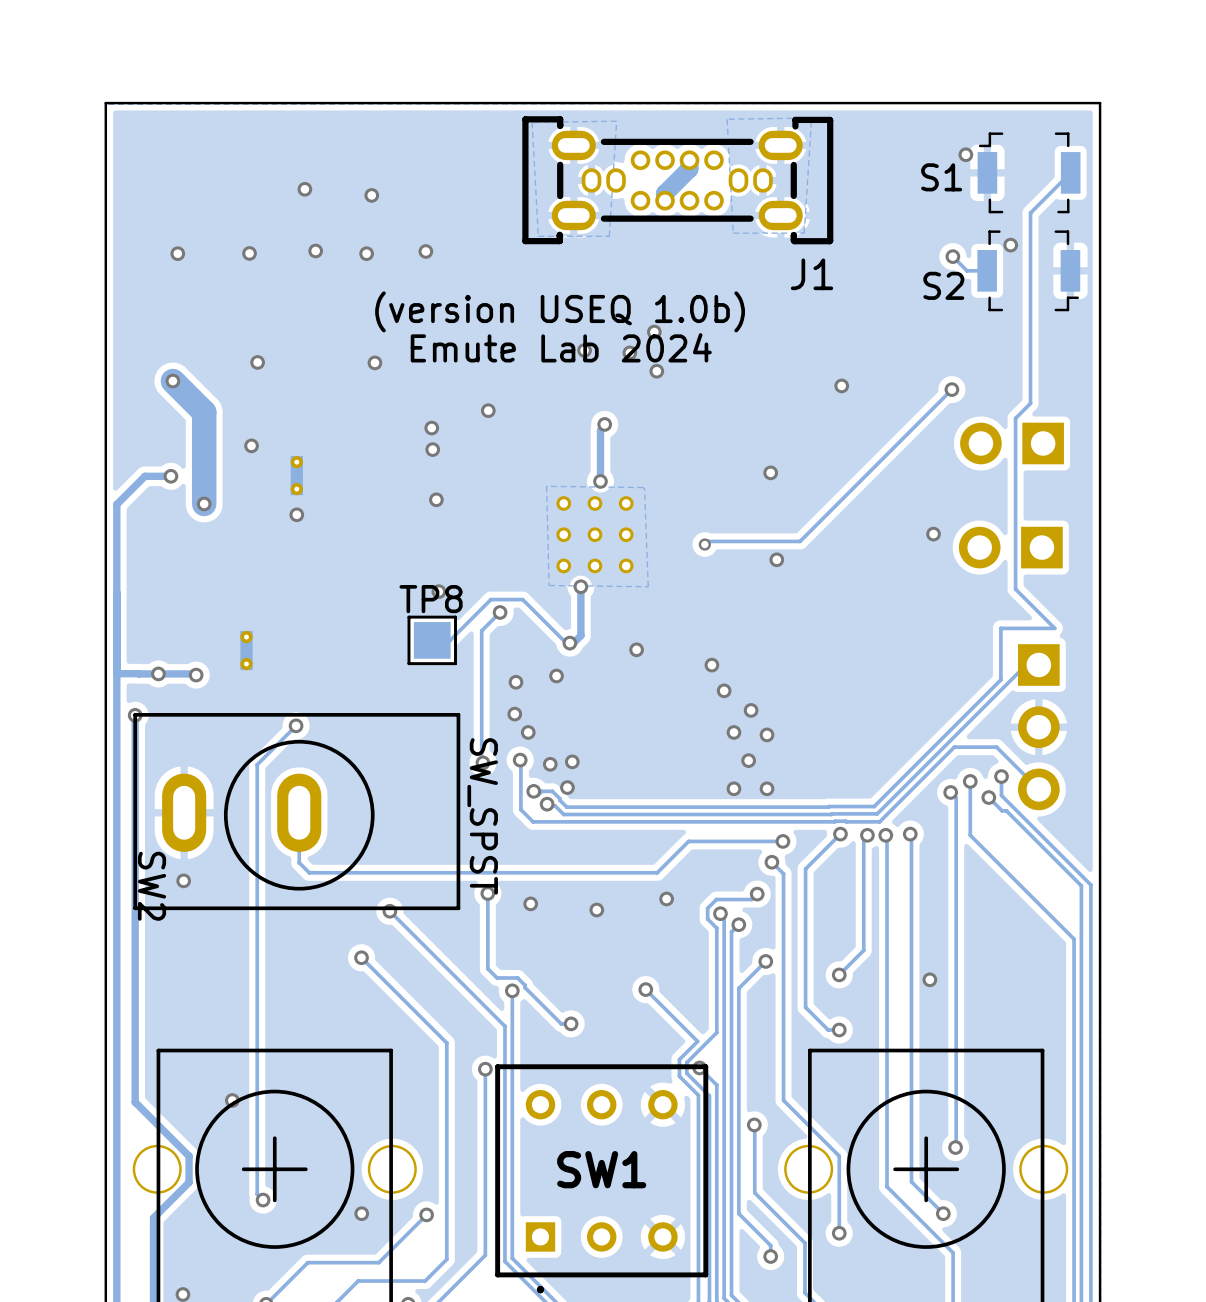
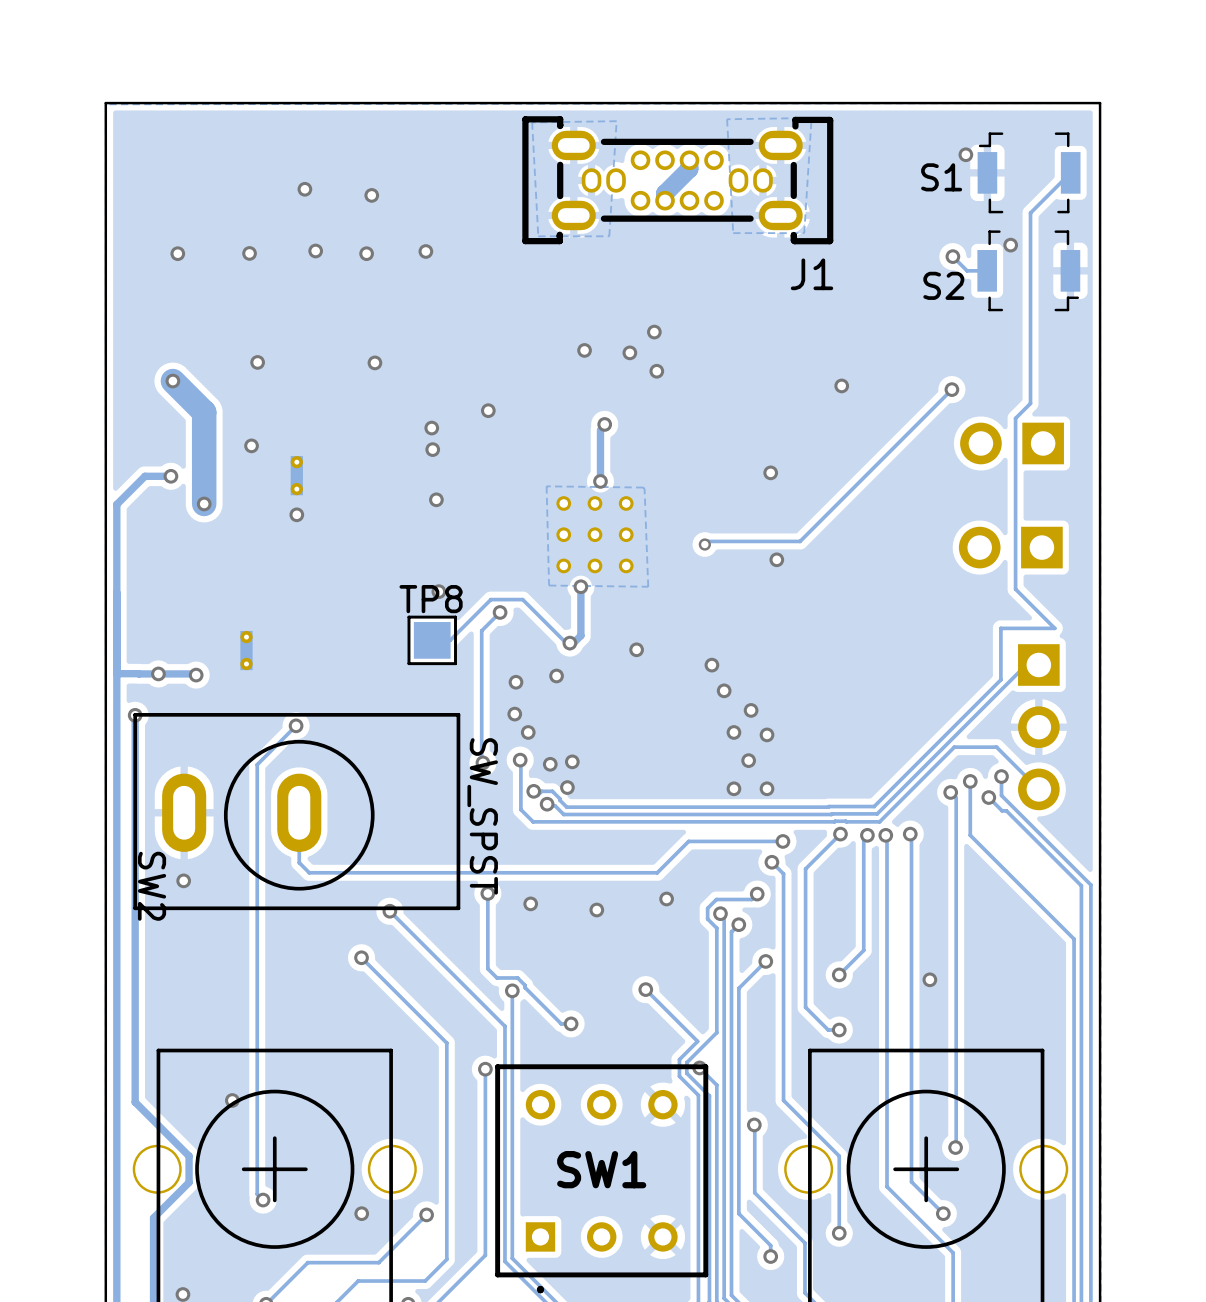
text: (version USEQ 1.0b) (560, 311) -> none
text: Emute Lab 2024 (561, 347) -> none
via: (933, 534) -> none

